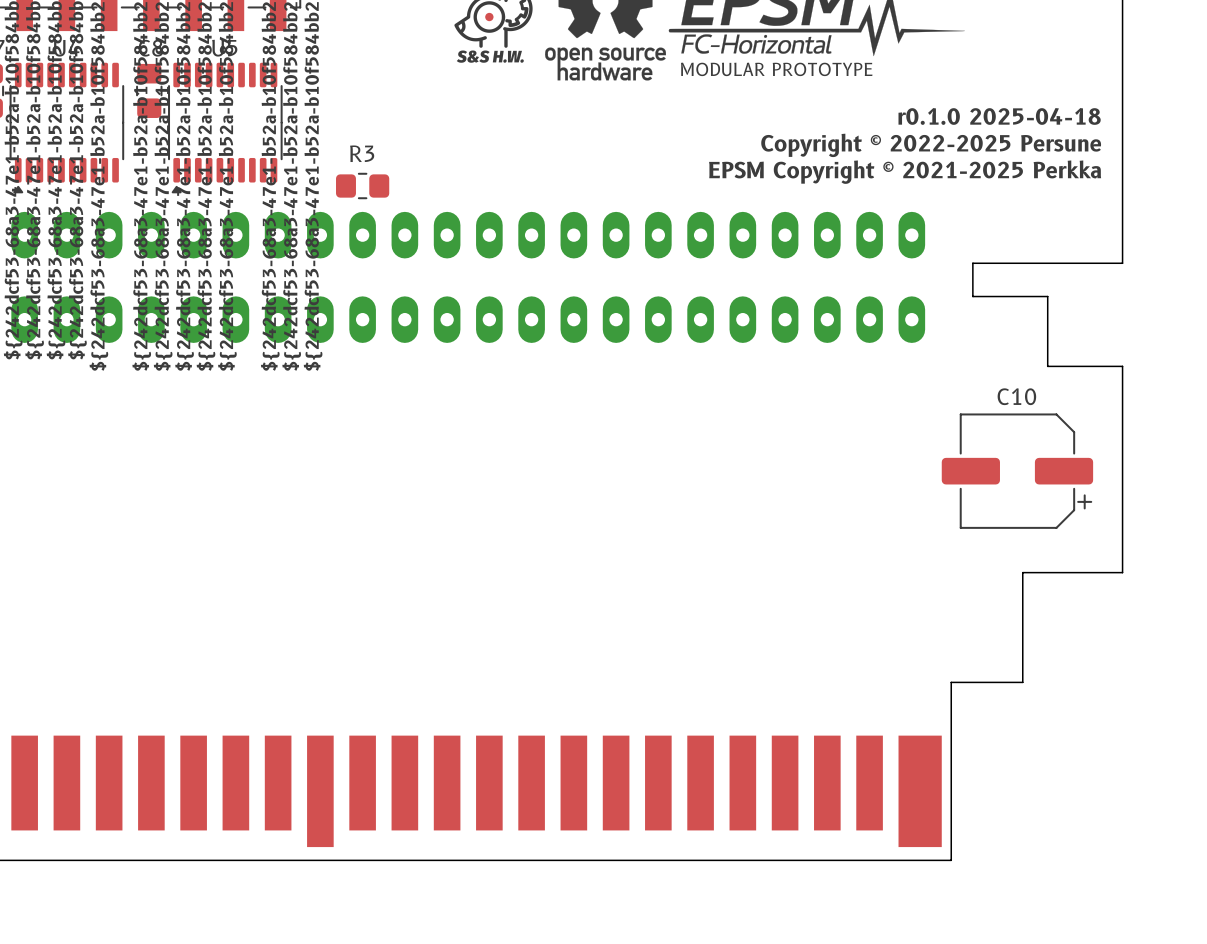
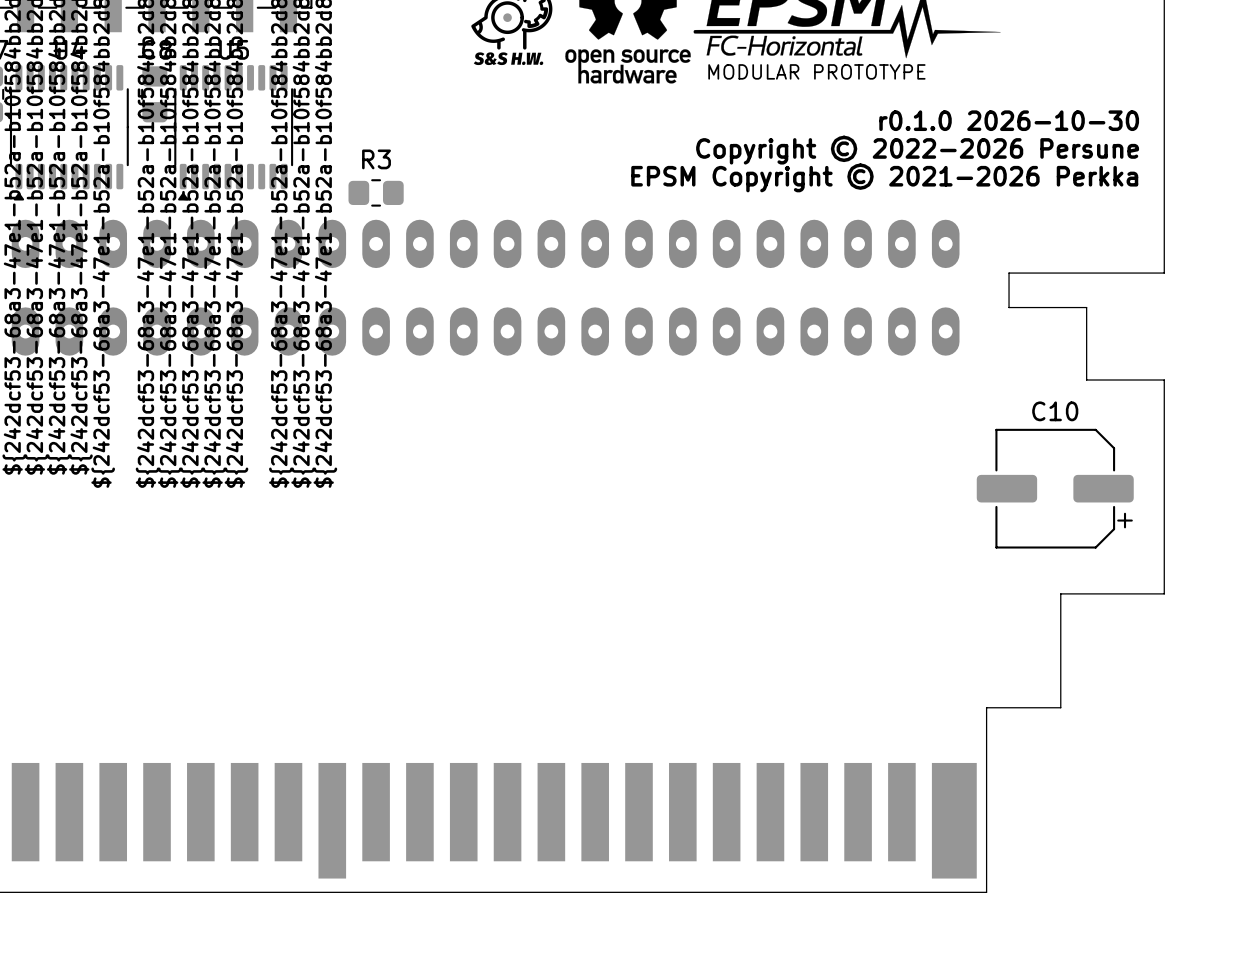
text: r0.1.0 2025-04-18 (999, 116) -> r0.1.0 2026-10-30 (1009, 120)
text: Copyright © 2022-2025 Persune (931, 145) -> Copyright © 2022-2026 Persune (917, 150)
text: EPSM Copyright © 2021-2025 Perkka (905, 172) -> EPSM Copyright © 2021-2026 Perkka (884, 177)

